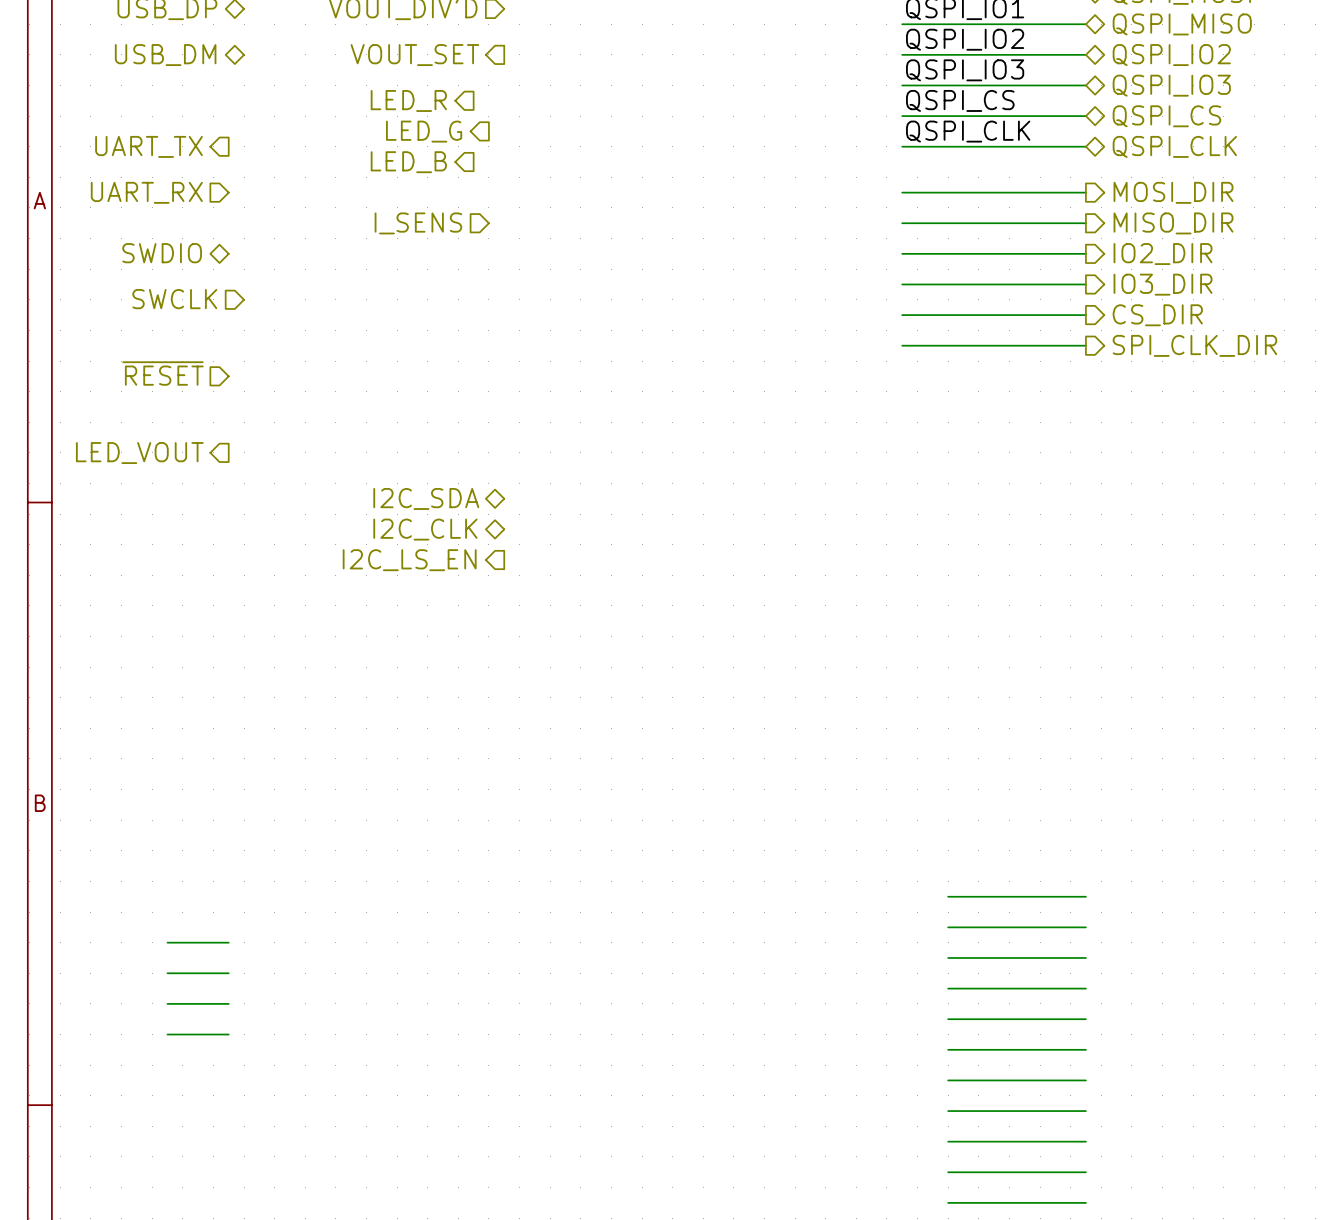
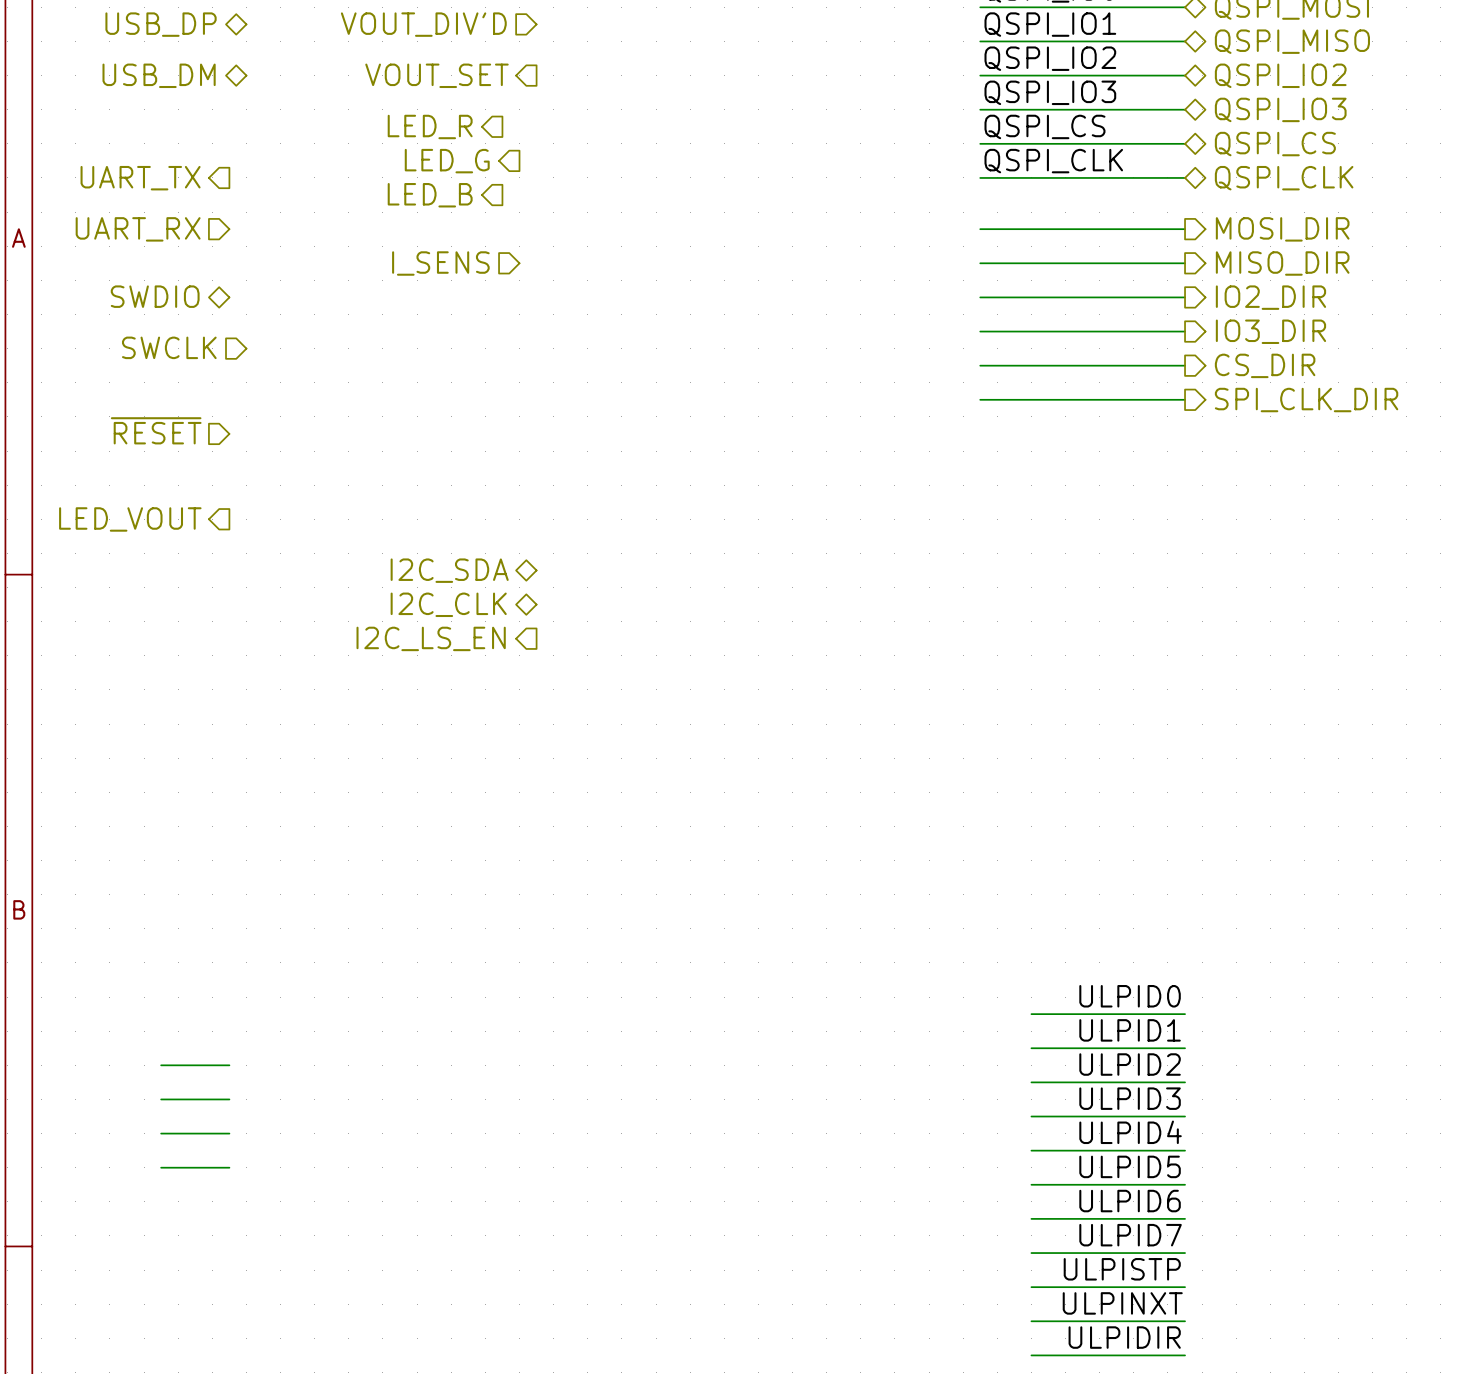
label: none -> ULPID0 (1130, 996)
label: none -> ULPID1 (1130, 1030)
label: none -> ULPID2 (1130, 1064)
label: none -> ULPID3 (1130, 1098)
label: none -> ULPID4 (1130, 1132)
label: none -> ULPID5 (1130, 1166)
label: none -> ULPID6 (1130, 1201)
label: none -> ULPID7 (1130, 1235)
label: none -> ULPISTP (1122, 1269)
label: none -> ULPINXT (1122, 1303)
label: none -> ULPIDIR (1124, 1337)

